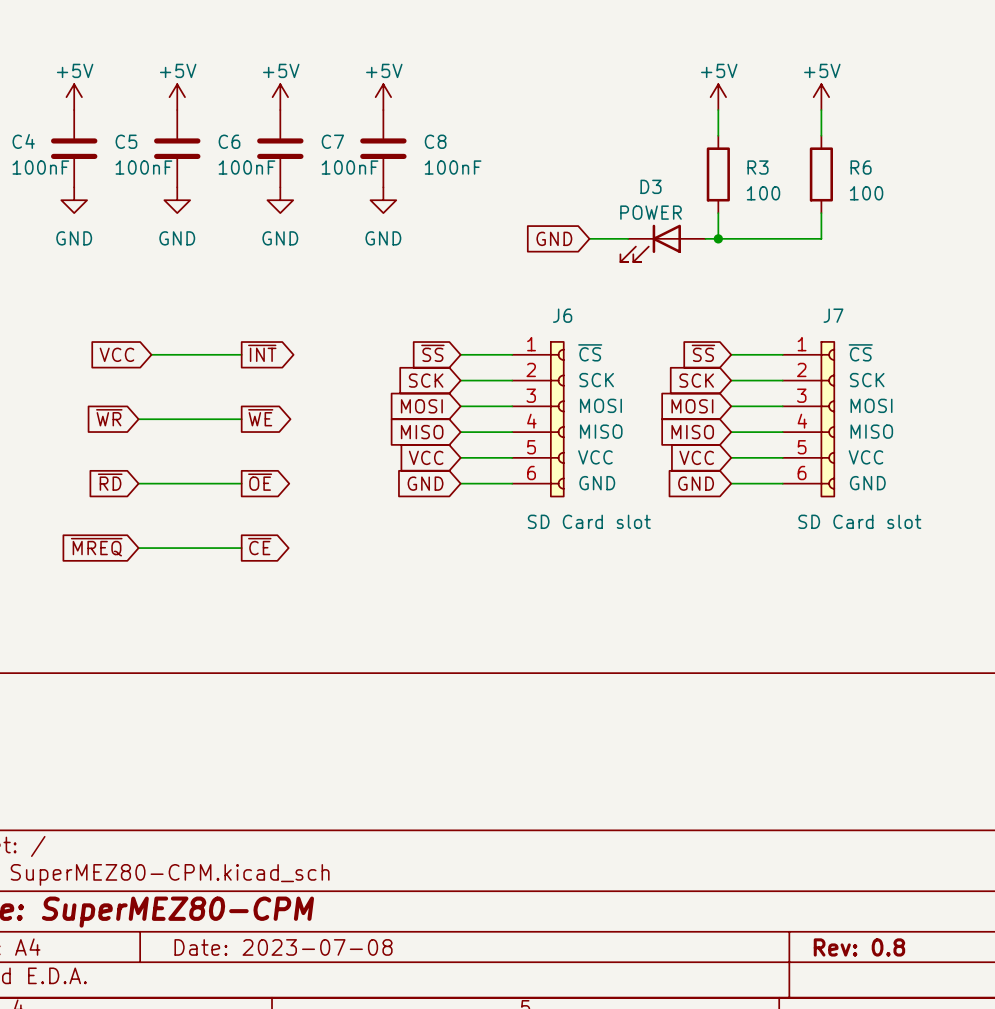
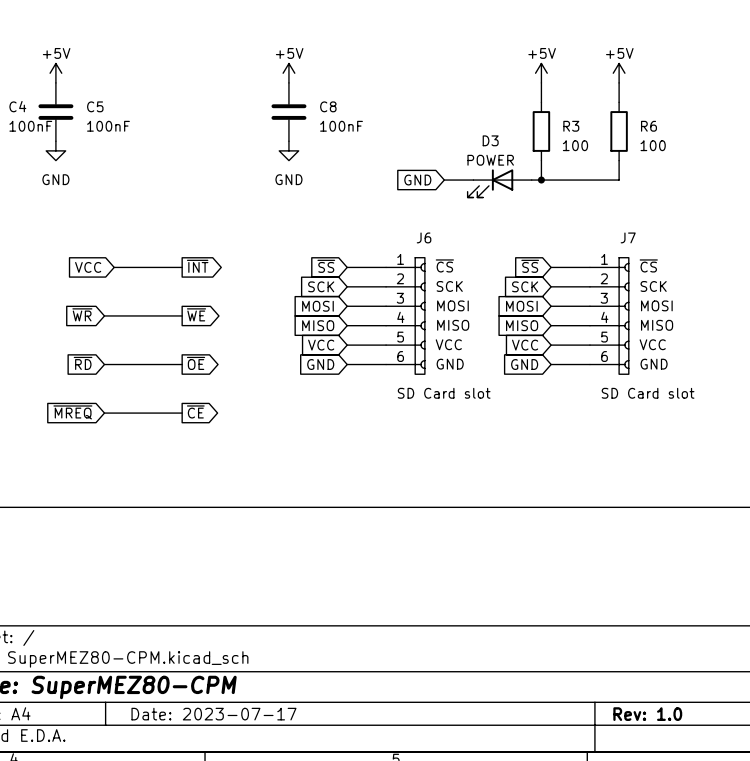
power symbol: +5V (177, 97) -> none
power symbol: +5V (280, 97) -> none
C6: 100nF (177, 148) -> none
C7: 100nF (280, 148) -> none
power symbol: GND (177, 200) -> none
power symbol: GND (280, 200) -> none
title block: Date: 2023-07-08 (283, 947) -> Date: 2023-07-17 (213, 714)
title block: Rev: 0.8 (859, 947) -> Rev: 1.0 (647, 714)

